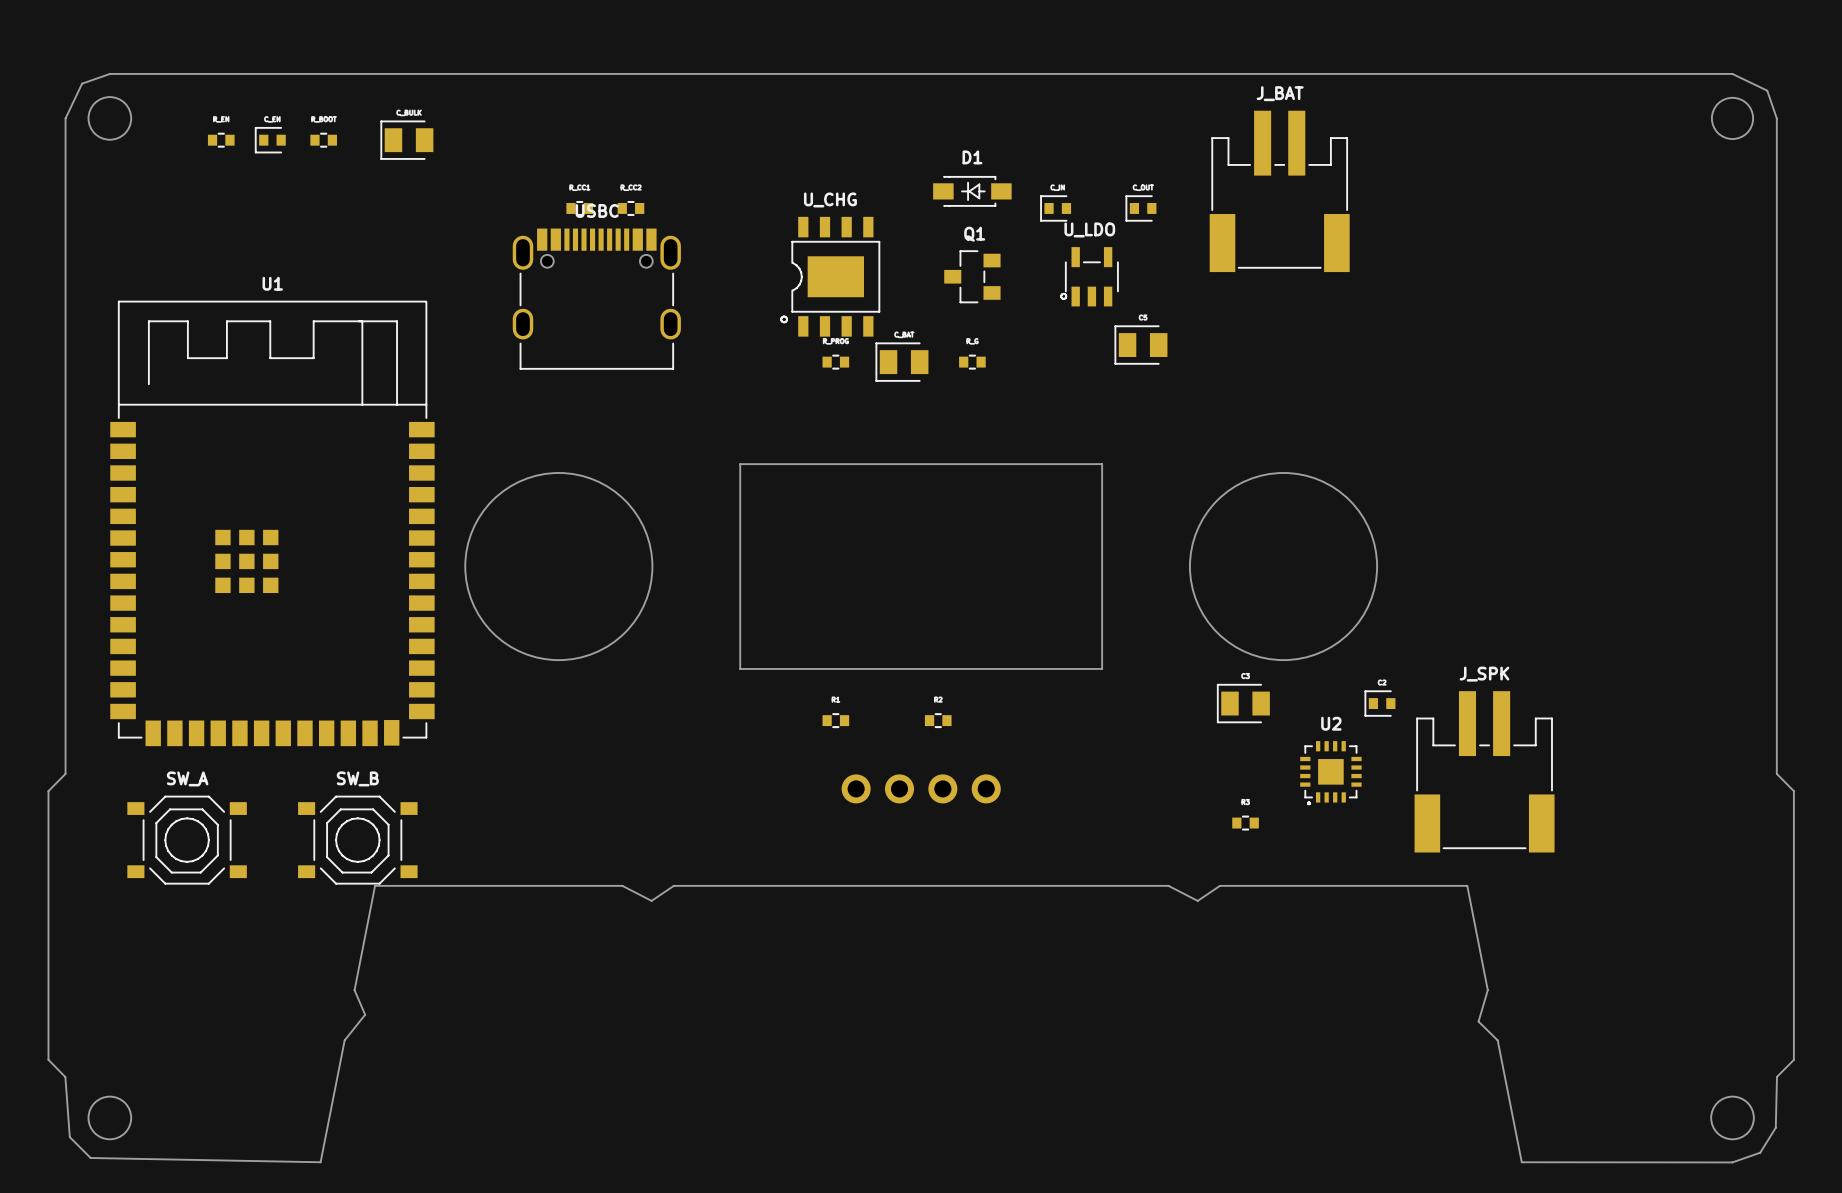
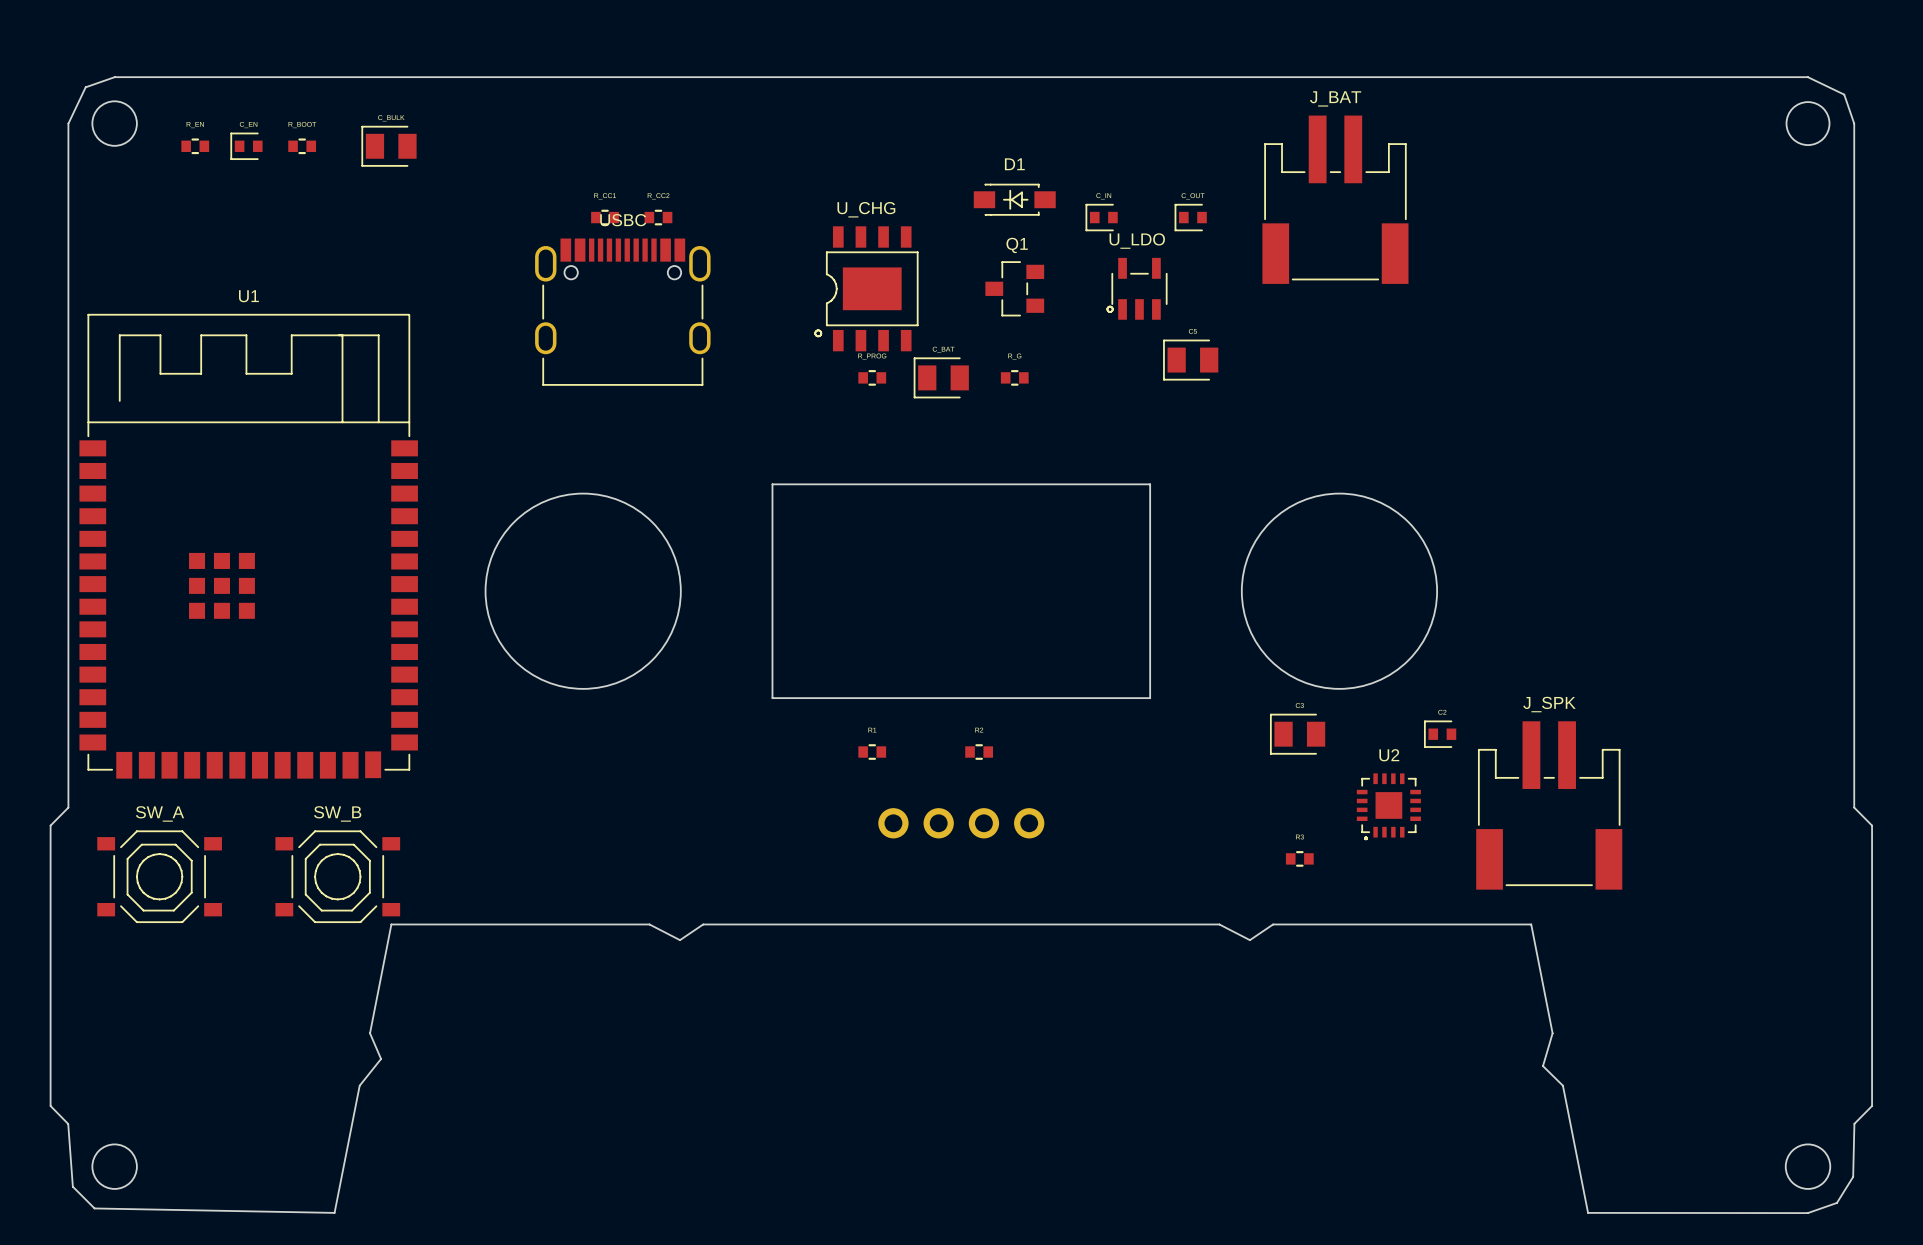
part position: (221, 140) -> (195, 146)
part position: (270, 140) -> (246, 146)
part position: (323, 140) -> (302, 146)
part position: (406, 140) -> (389, 146)
U1 position: (272, 523) -> (248, 546)
SW_A position: (187, 840) -> (159, 876)
SW_B position: (357, 840) -> (337, 876)

